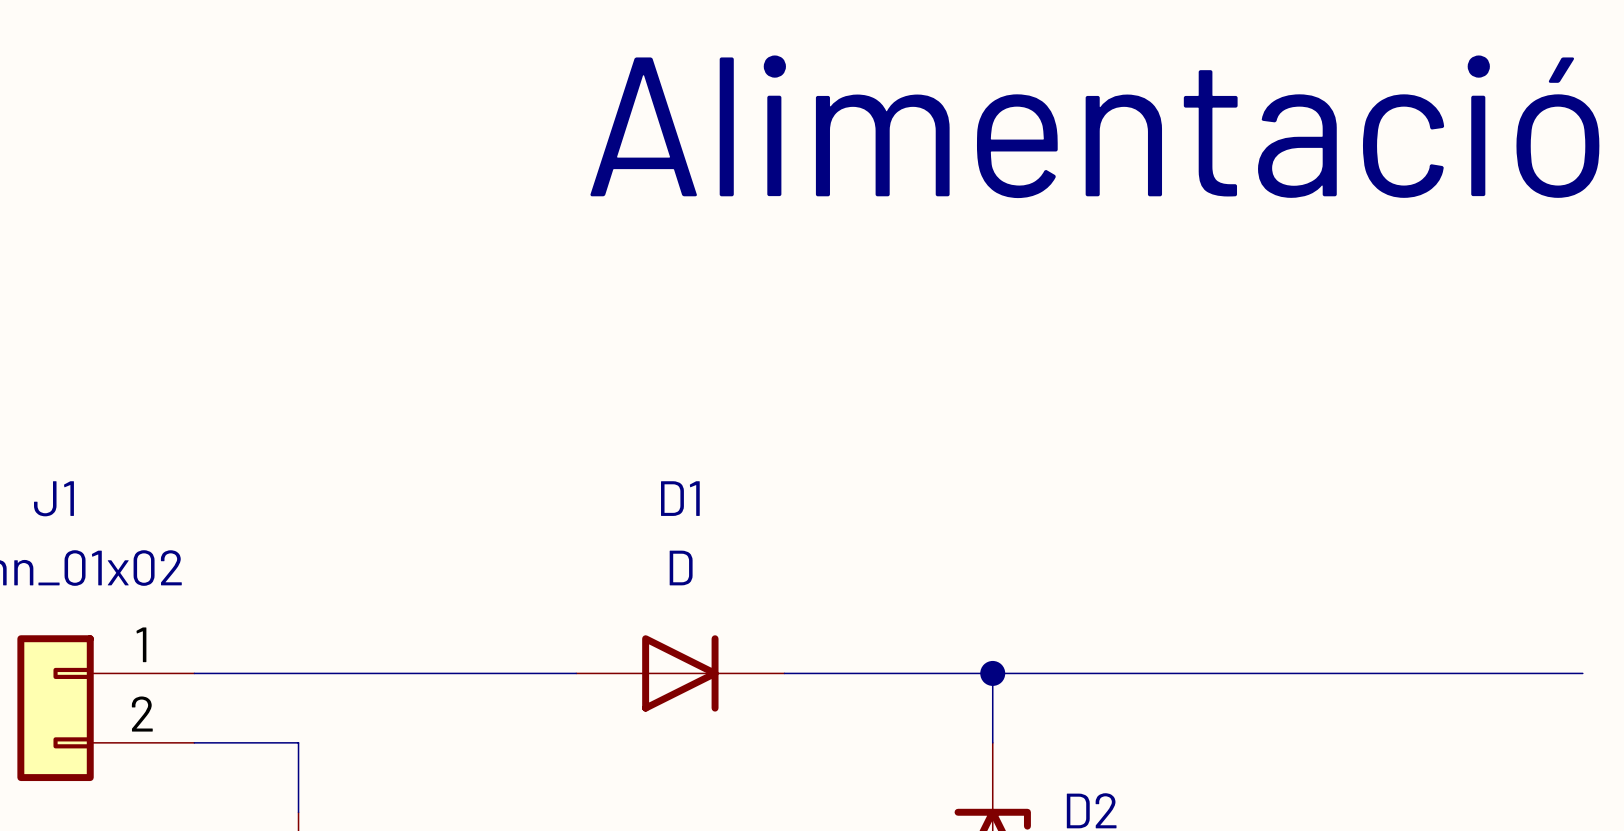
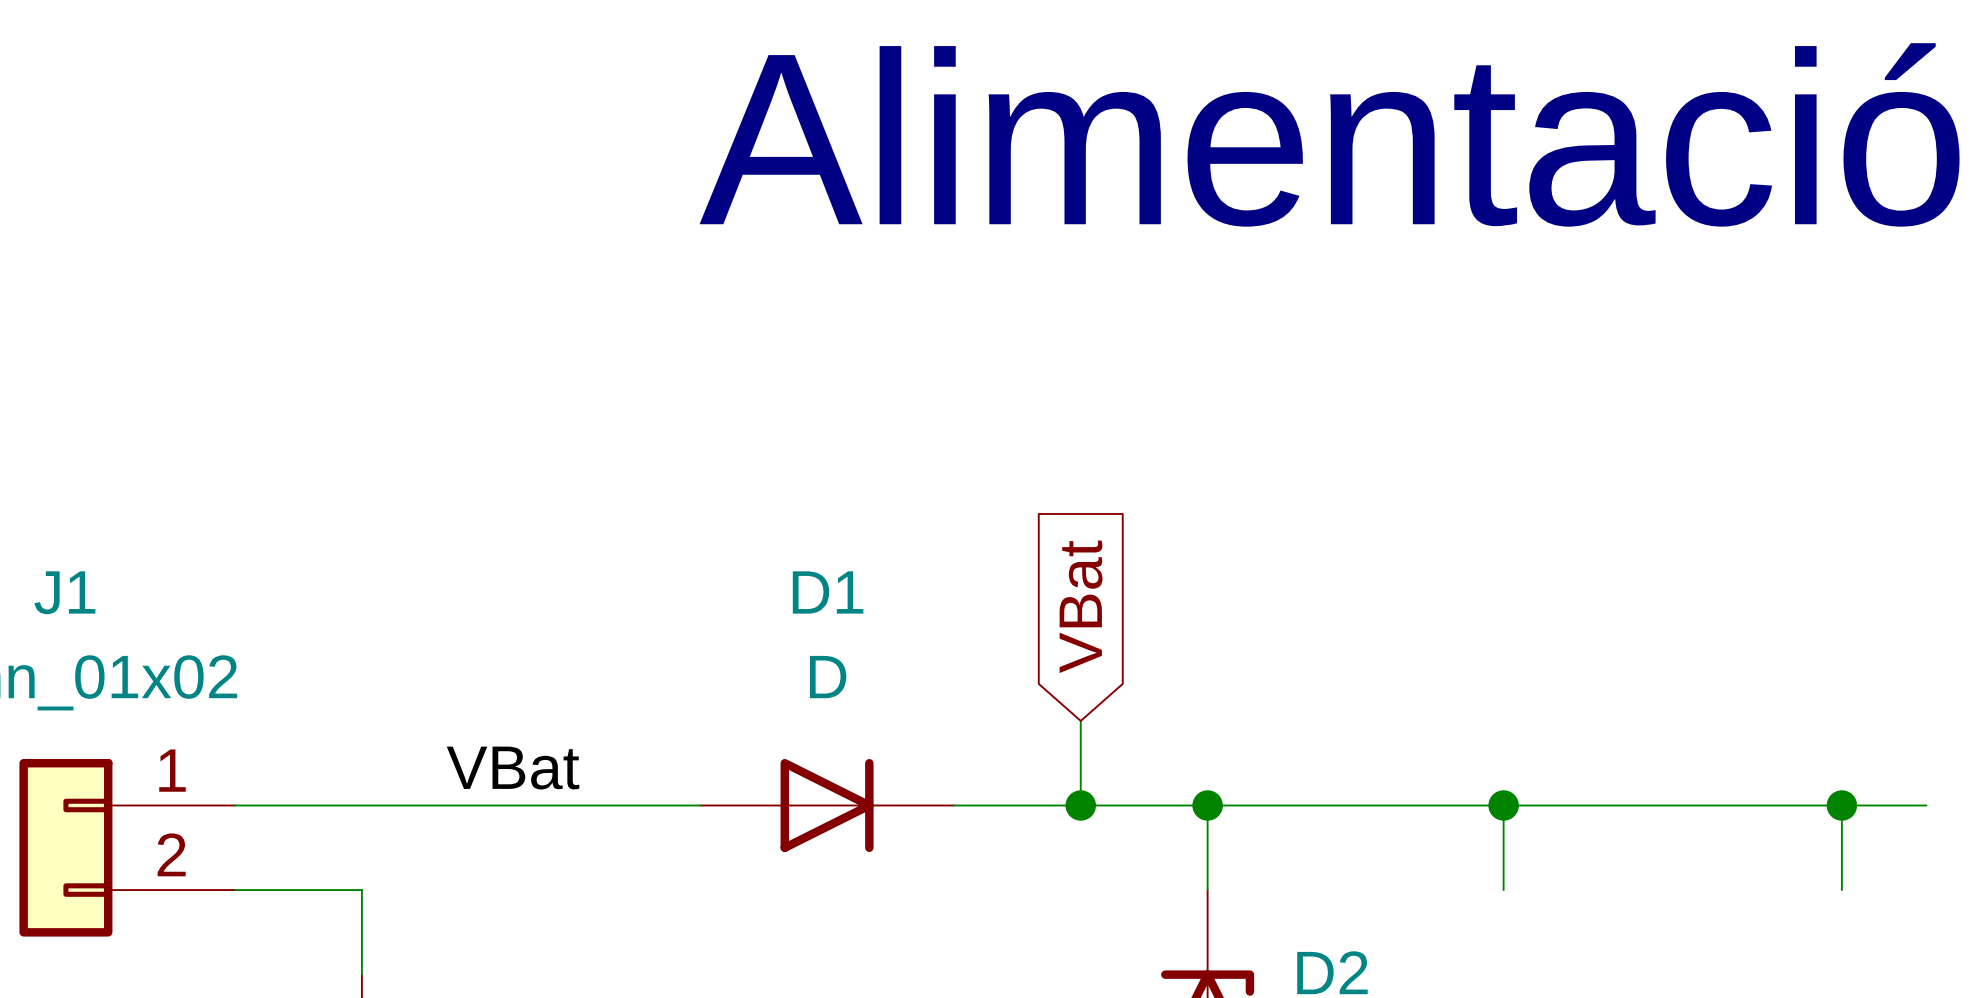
global label: none -> VBat (1081, 606)
wire: none -> (1080, 720) (1080, 805)
label: none -> VBat (513, 768)
junction: none -> (1080, 805)
wire: none -> (1503, 805) (1503, 890)
junction: none -> (1503, 805)
wire: none -> (1841, 805) (1841, 890)
junction: none -> (1841, 805)

